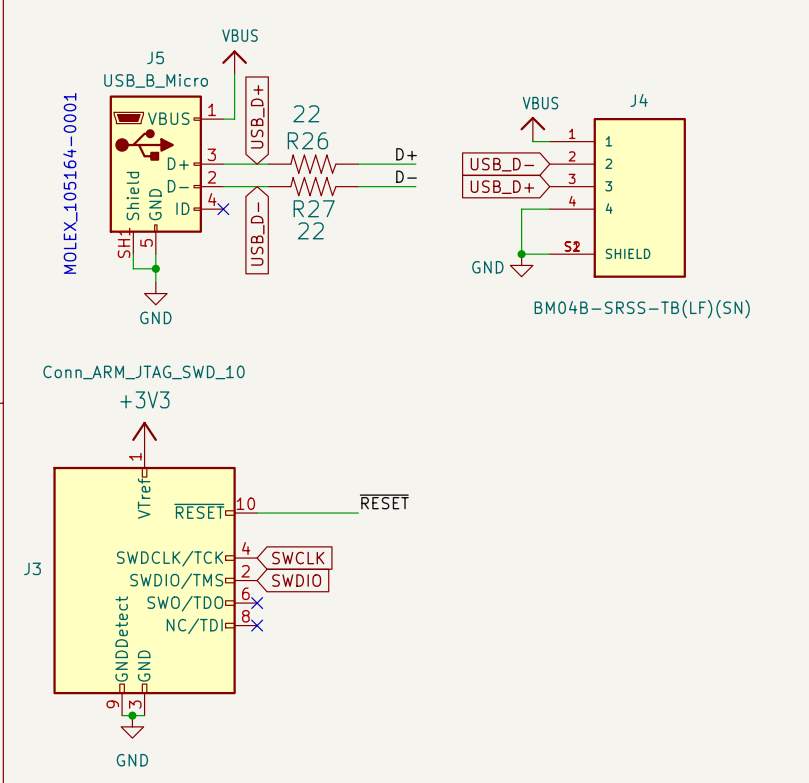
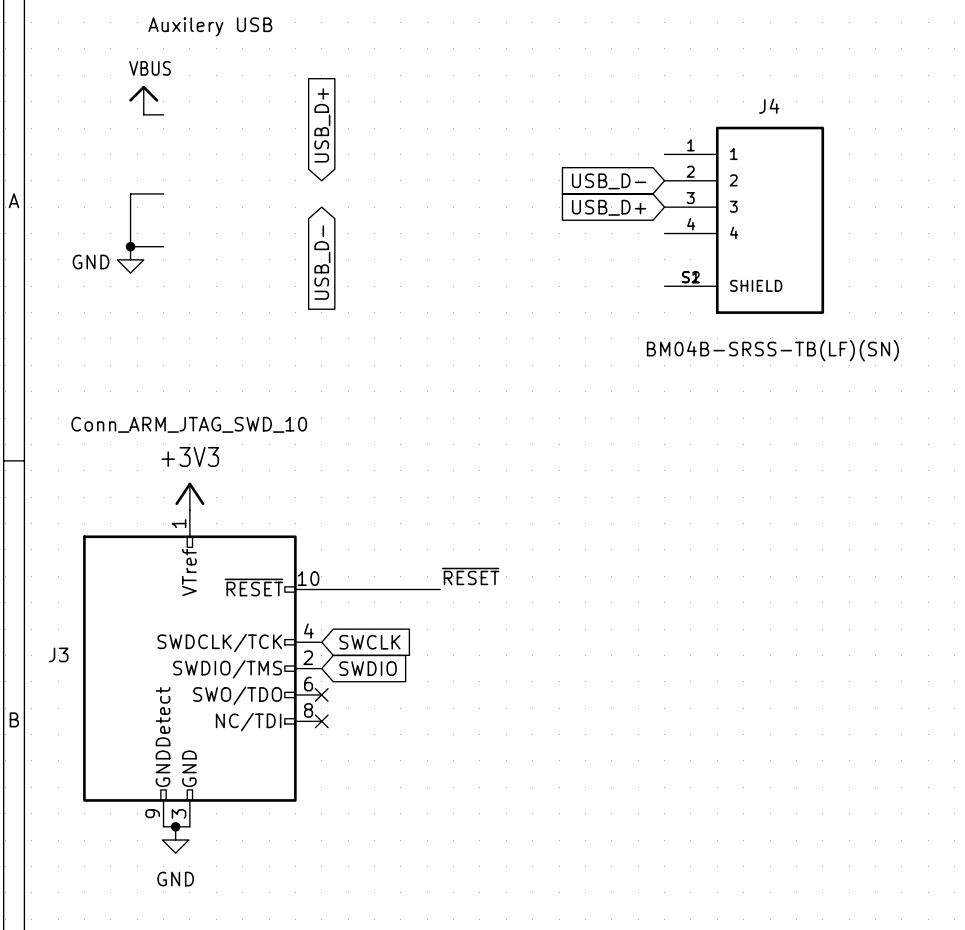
text: none -> Auxilery USB (210, 26)
power symbol position: VBUS (234, 62) -> VBUS (143, 99)
wire: (234, 74) (234, 119) (223, 119) -> none
power symbol: VBUS (532, 128) -> none
wire: (532, 140) (549, 141) -> none
label: D+ (406, 154) -> none
wire: (223, 164) (268, 164) -> none
R26: 22 (313, 164) -> none
wire: (358, 164) (415, 164) -> none
J5: USB_B_Micro (166, 174) -> none
wire: none -> (163, 193) (130, 193) (130, 246) (163, 246)
label: D- (406, 176) -> none
text: MOLEX_105164-0001 (70, 183) -> none
wire: (223, 186) (268, 186) -> none
R27: 22 (313, 186) -> none
wire: (358, 186) (415, 186) -> none
no-connect mark: (223, 209) -> none
wire: (549, 209) (521, 209) (521, 254) (549, 254) -> none
junction: none -> (130, 246)
wire: (133, 254) (133, 268) (155, 268) -> none
wire: (155, 254) (155, 282) -> none
junction: (521, 254) -> none
power symbol: GND (521, 265) -> none
junction: (155, 268) -> none
power symbol position: GND (155, 293) -> GND (130, 259)
power symbol text position: GND (155, 317) -> GND (91, 262)

